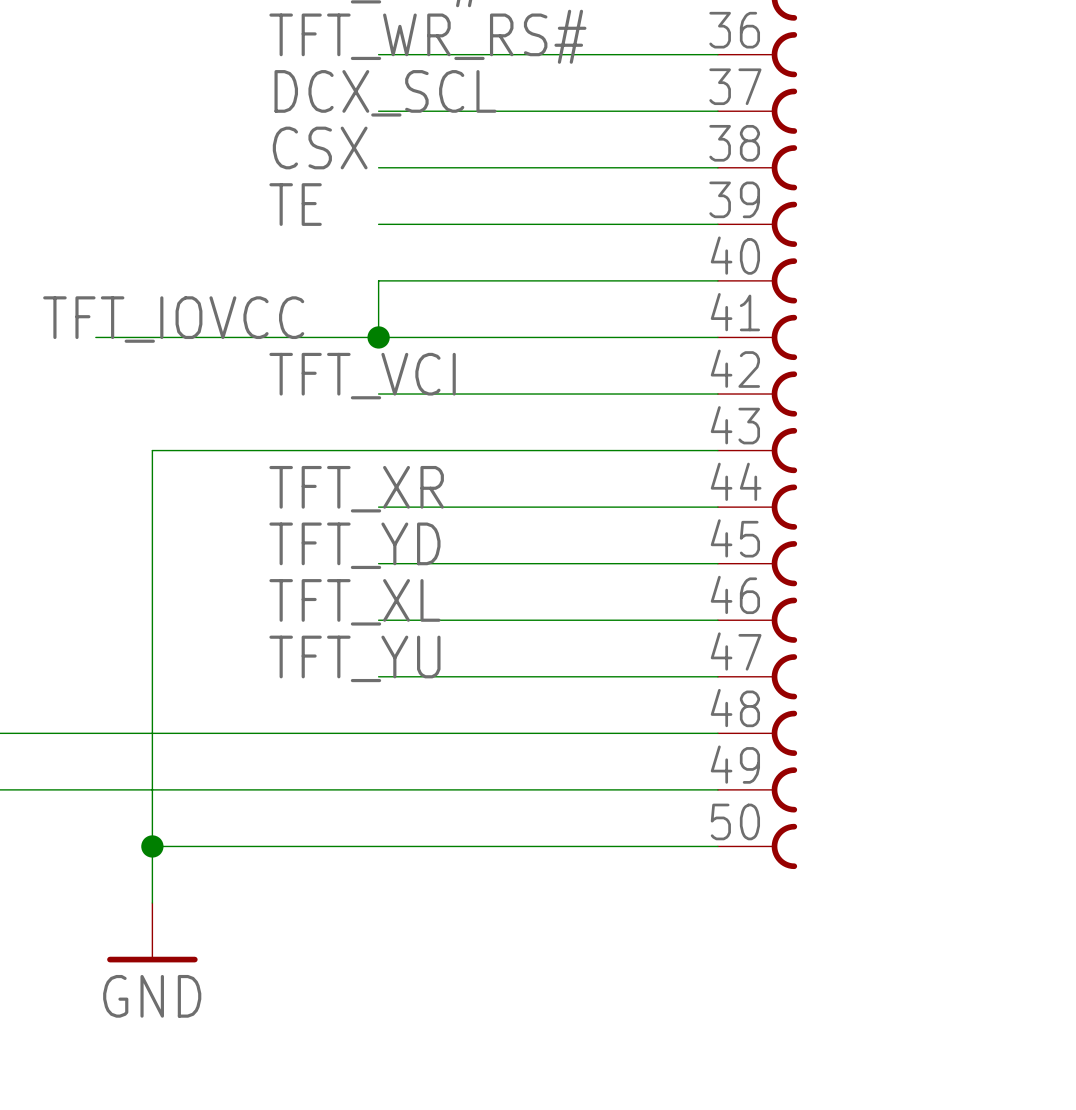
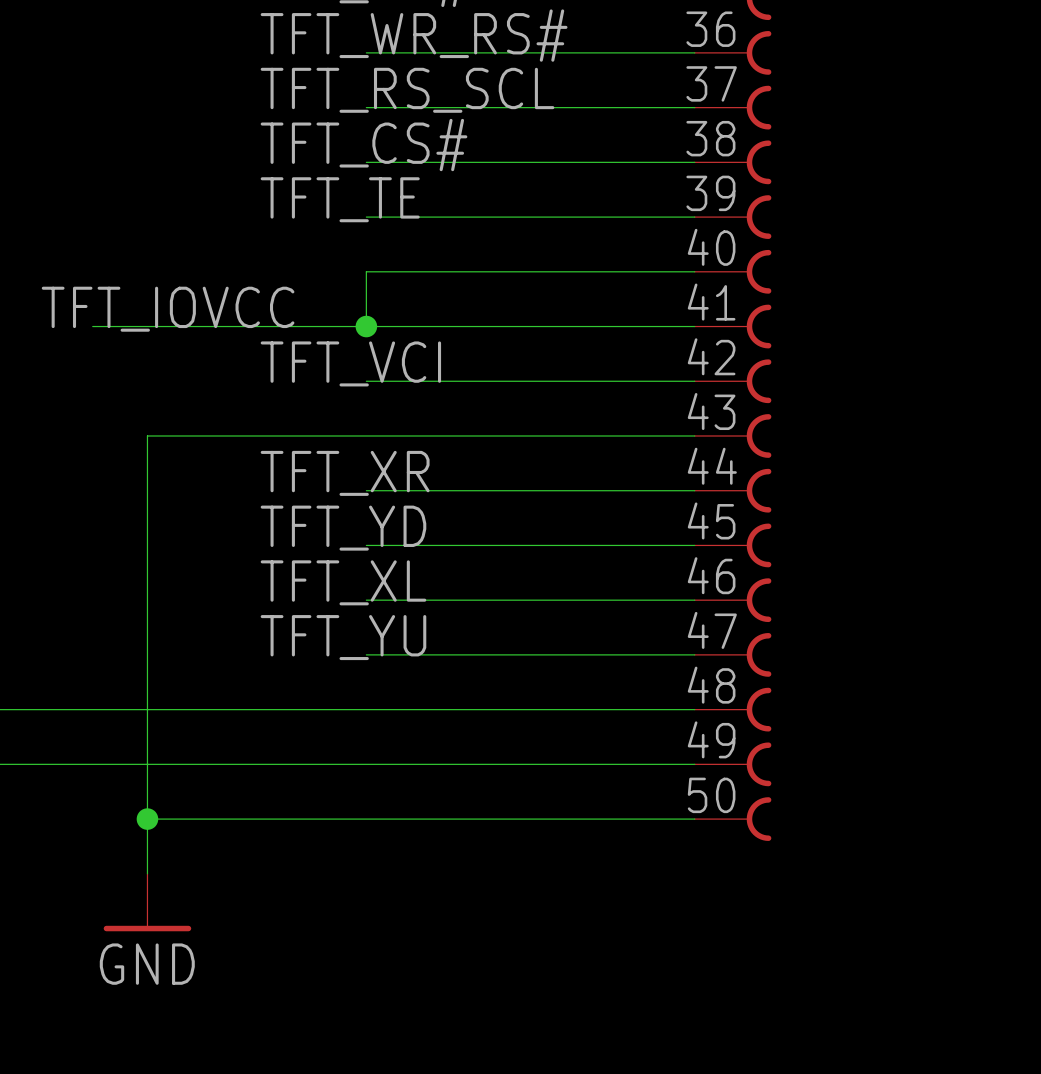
label: DCX_SCL (385, 93) -> TFT_RS_SCL (407, 90)
label: CSX (320, 147) -> TFT_CS# (364, 145)
label: TE (295, 204) -> TFT_TE (340, 199)

